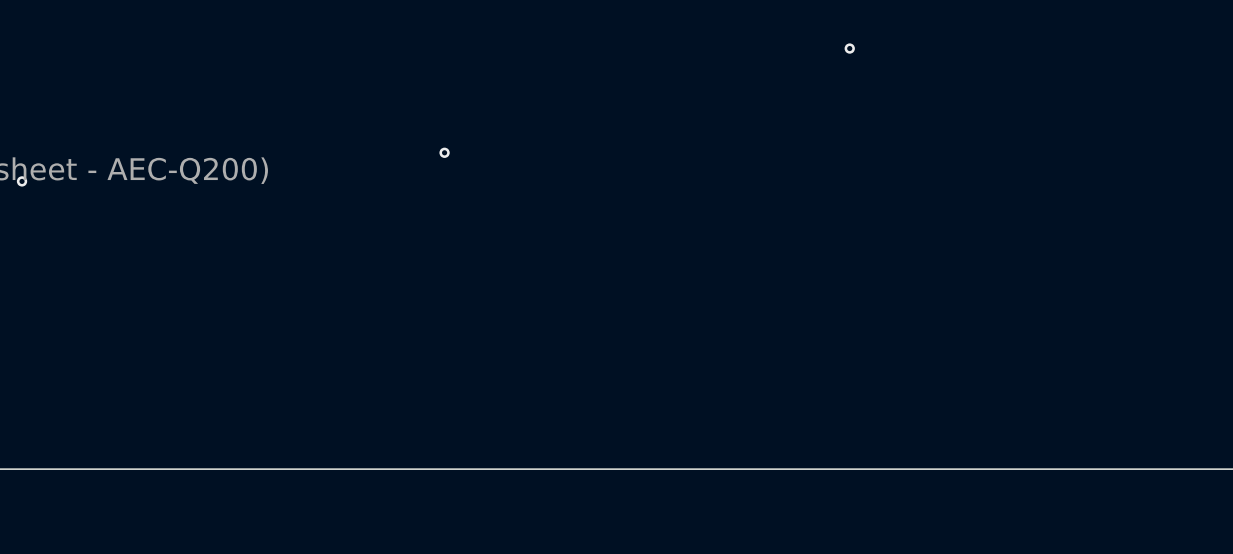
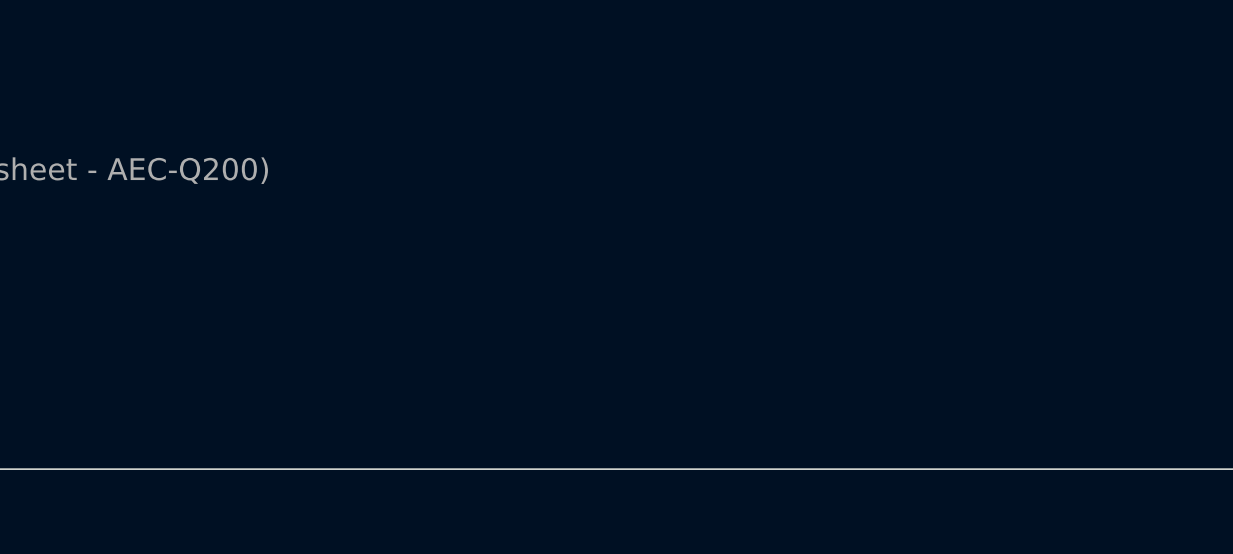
via: (849, 48) -> none
via: (444, 152) -> none
via: (22, 181) -> none

